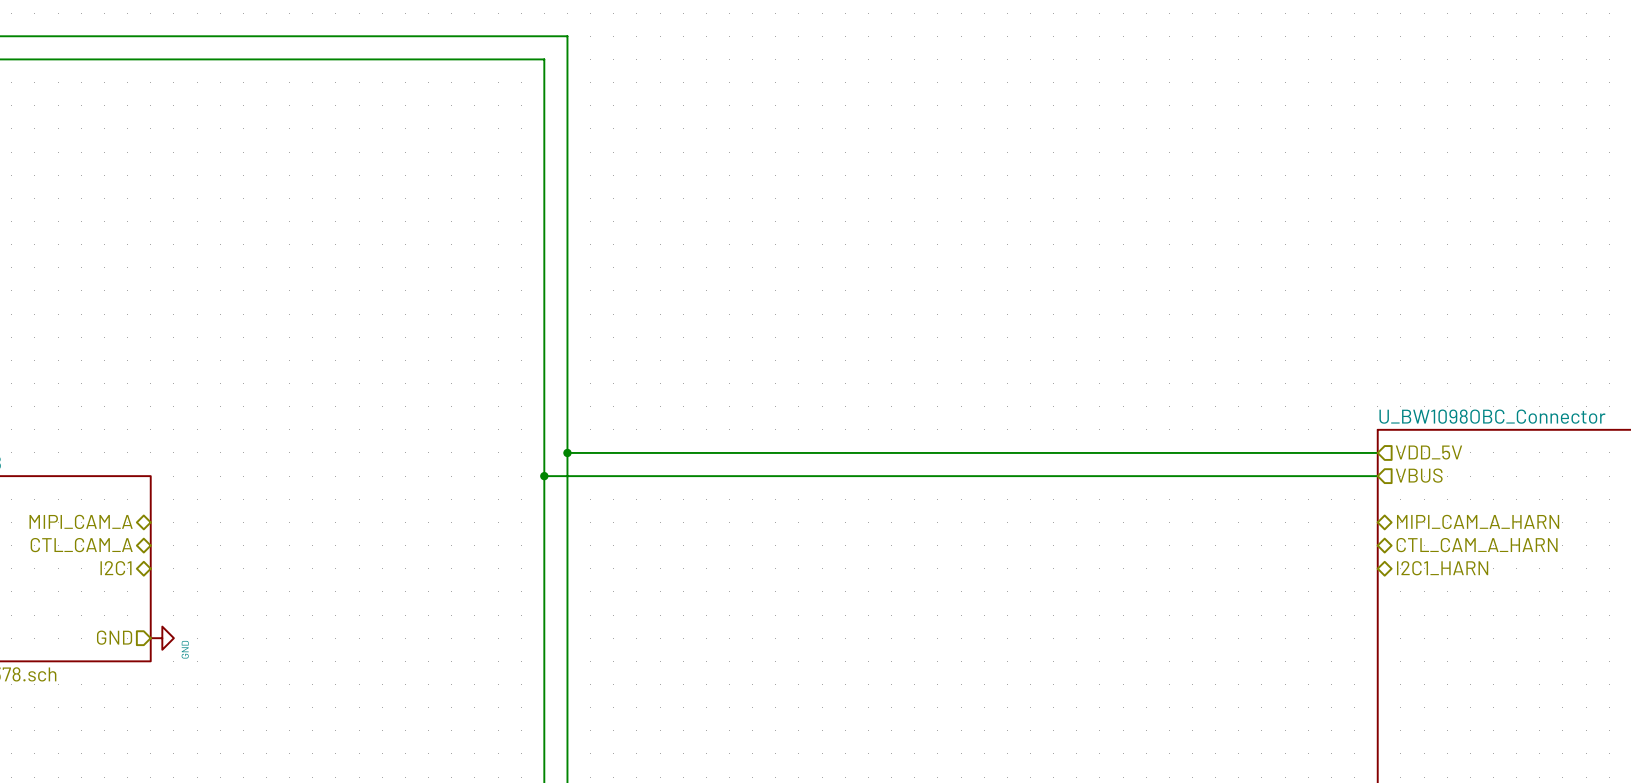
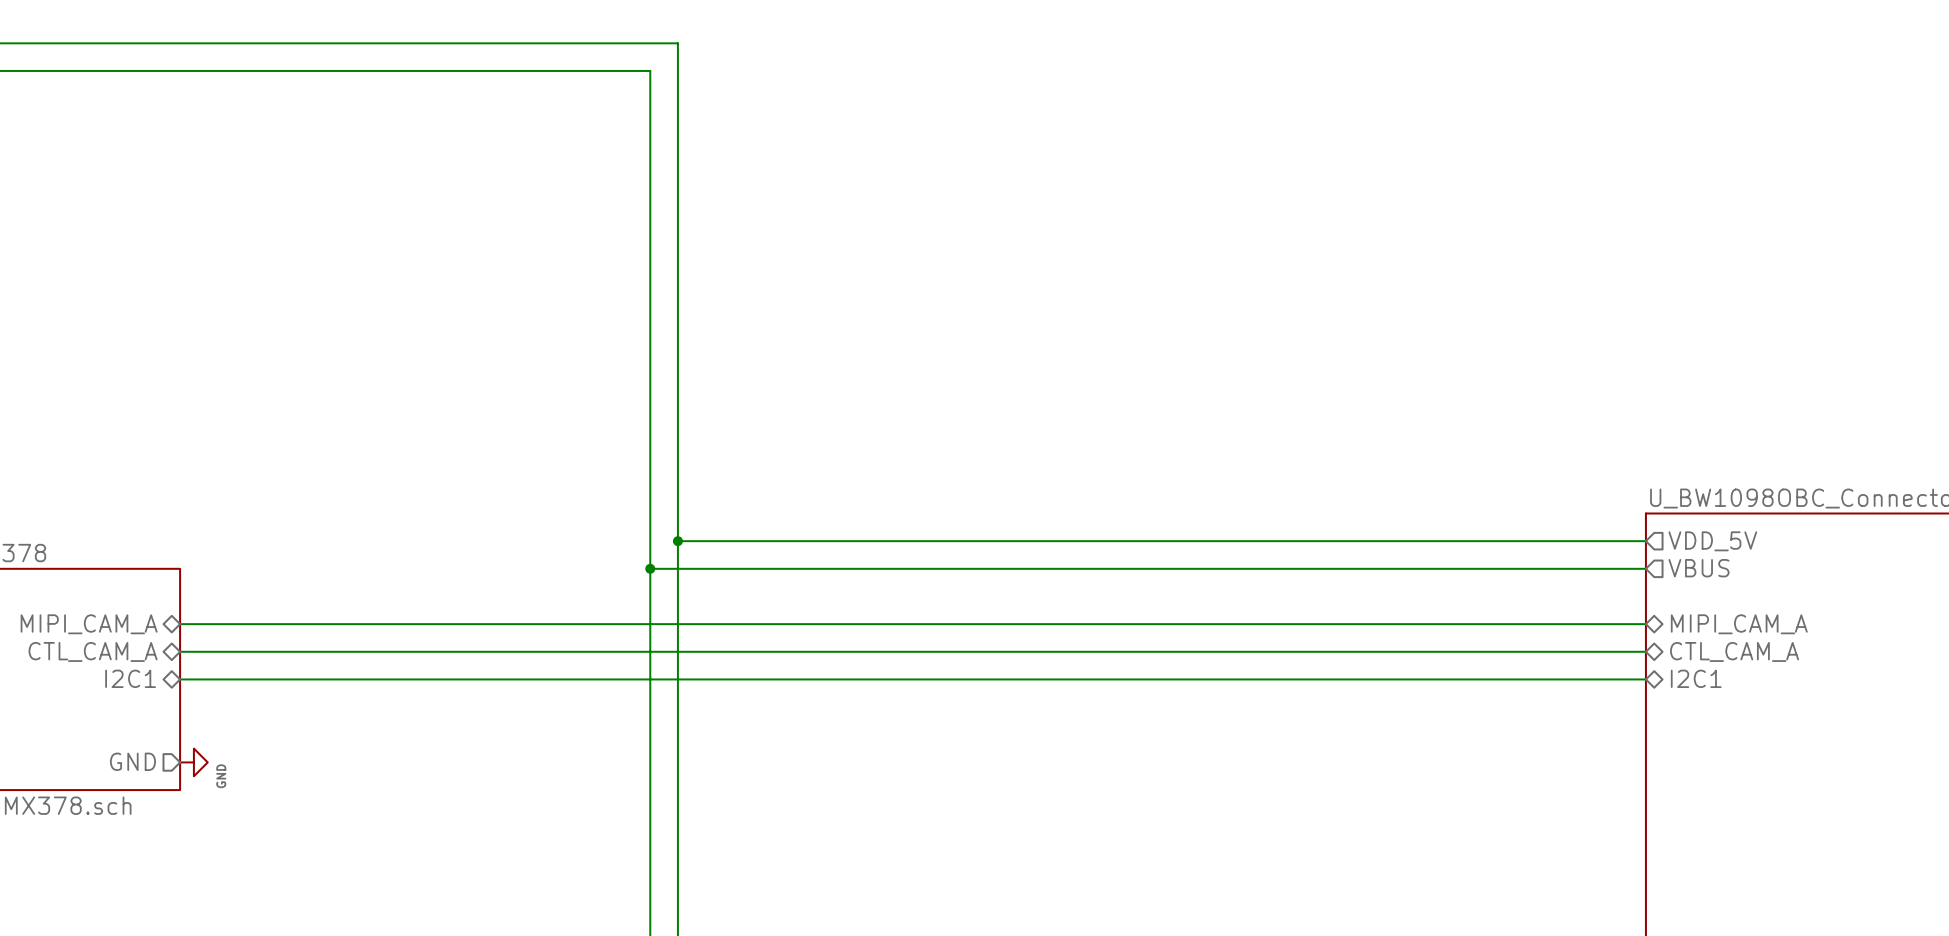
hierarchical label: MIPI_CAM_A_HARN (1478, 521) -> MIPI_CAM_A (1739, 624)
wire: none -> (180, 624) (1645, 624)
wire: none -> (180, 651) (1645, 651)
hierarchical label: CTL_CAM_A_HARN (1477, 545) -> CTL_CAM_A (1734, 651)
wire: none -> (180, 679) (1645, 679)
hierarchical label: I2C1_HARN (1442, 568) -> I2C1 (1696, 678)

